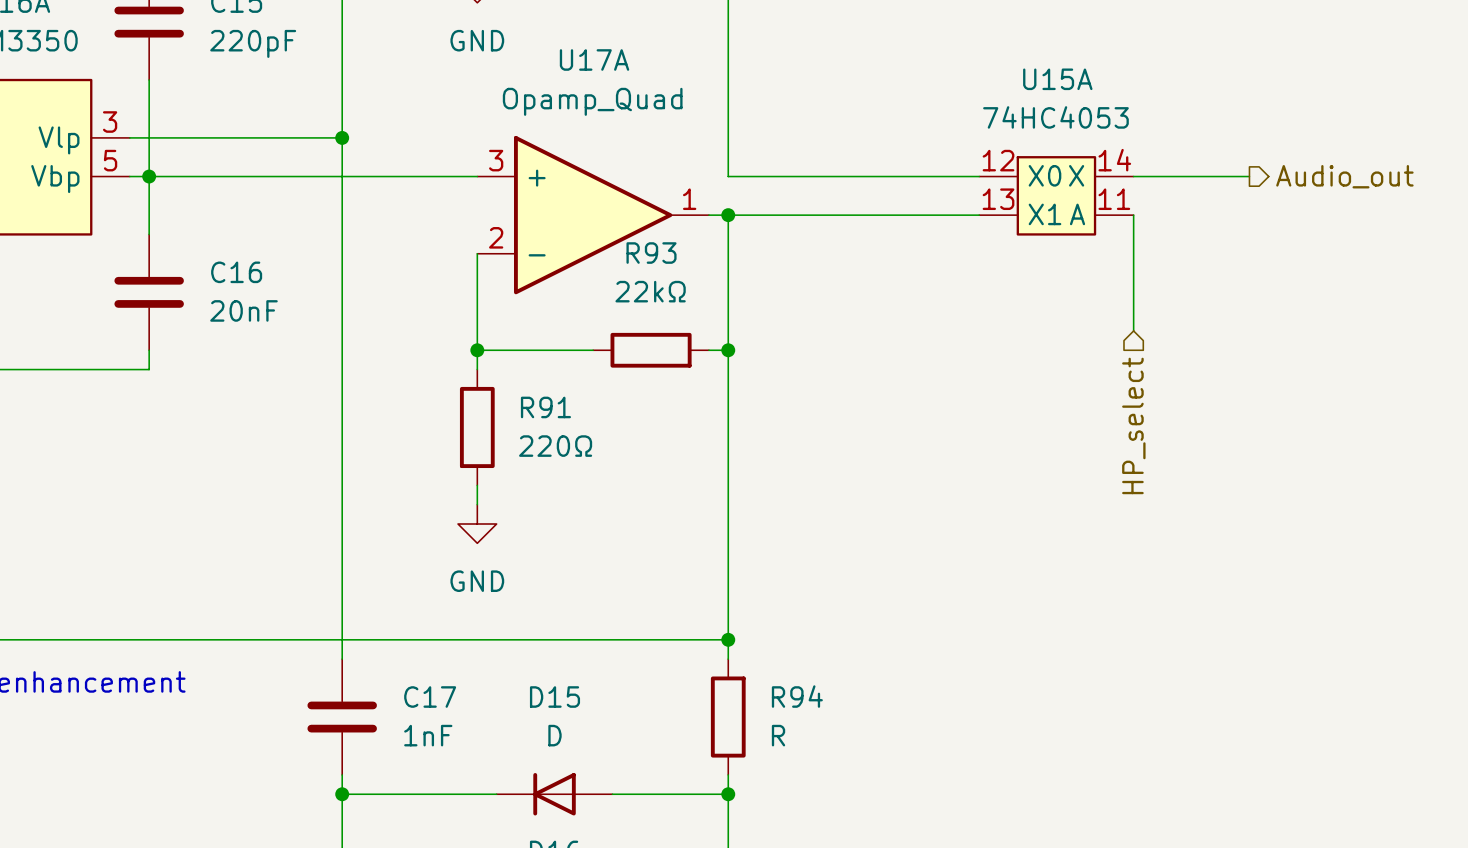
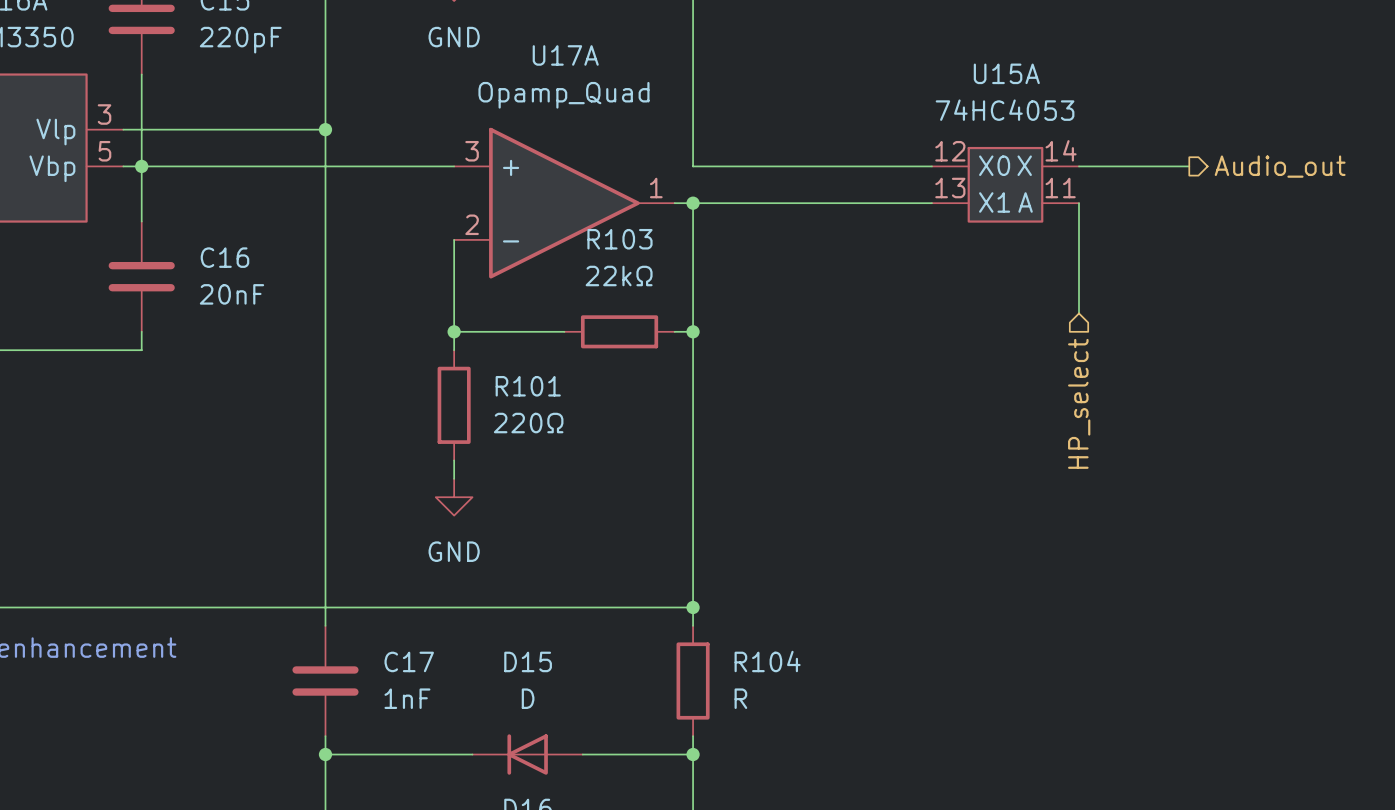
R93 name: R93 (651, 253) -> R103 (619, 239)
R91 name: R91 (545, 407) -> R101 (528, 386)
R94 name: R94 (797, 696) -> R104 (767, 661)

